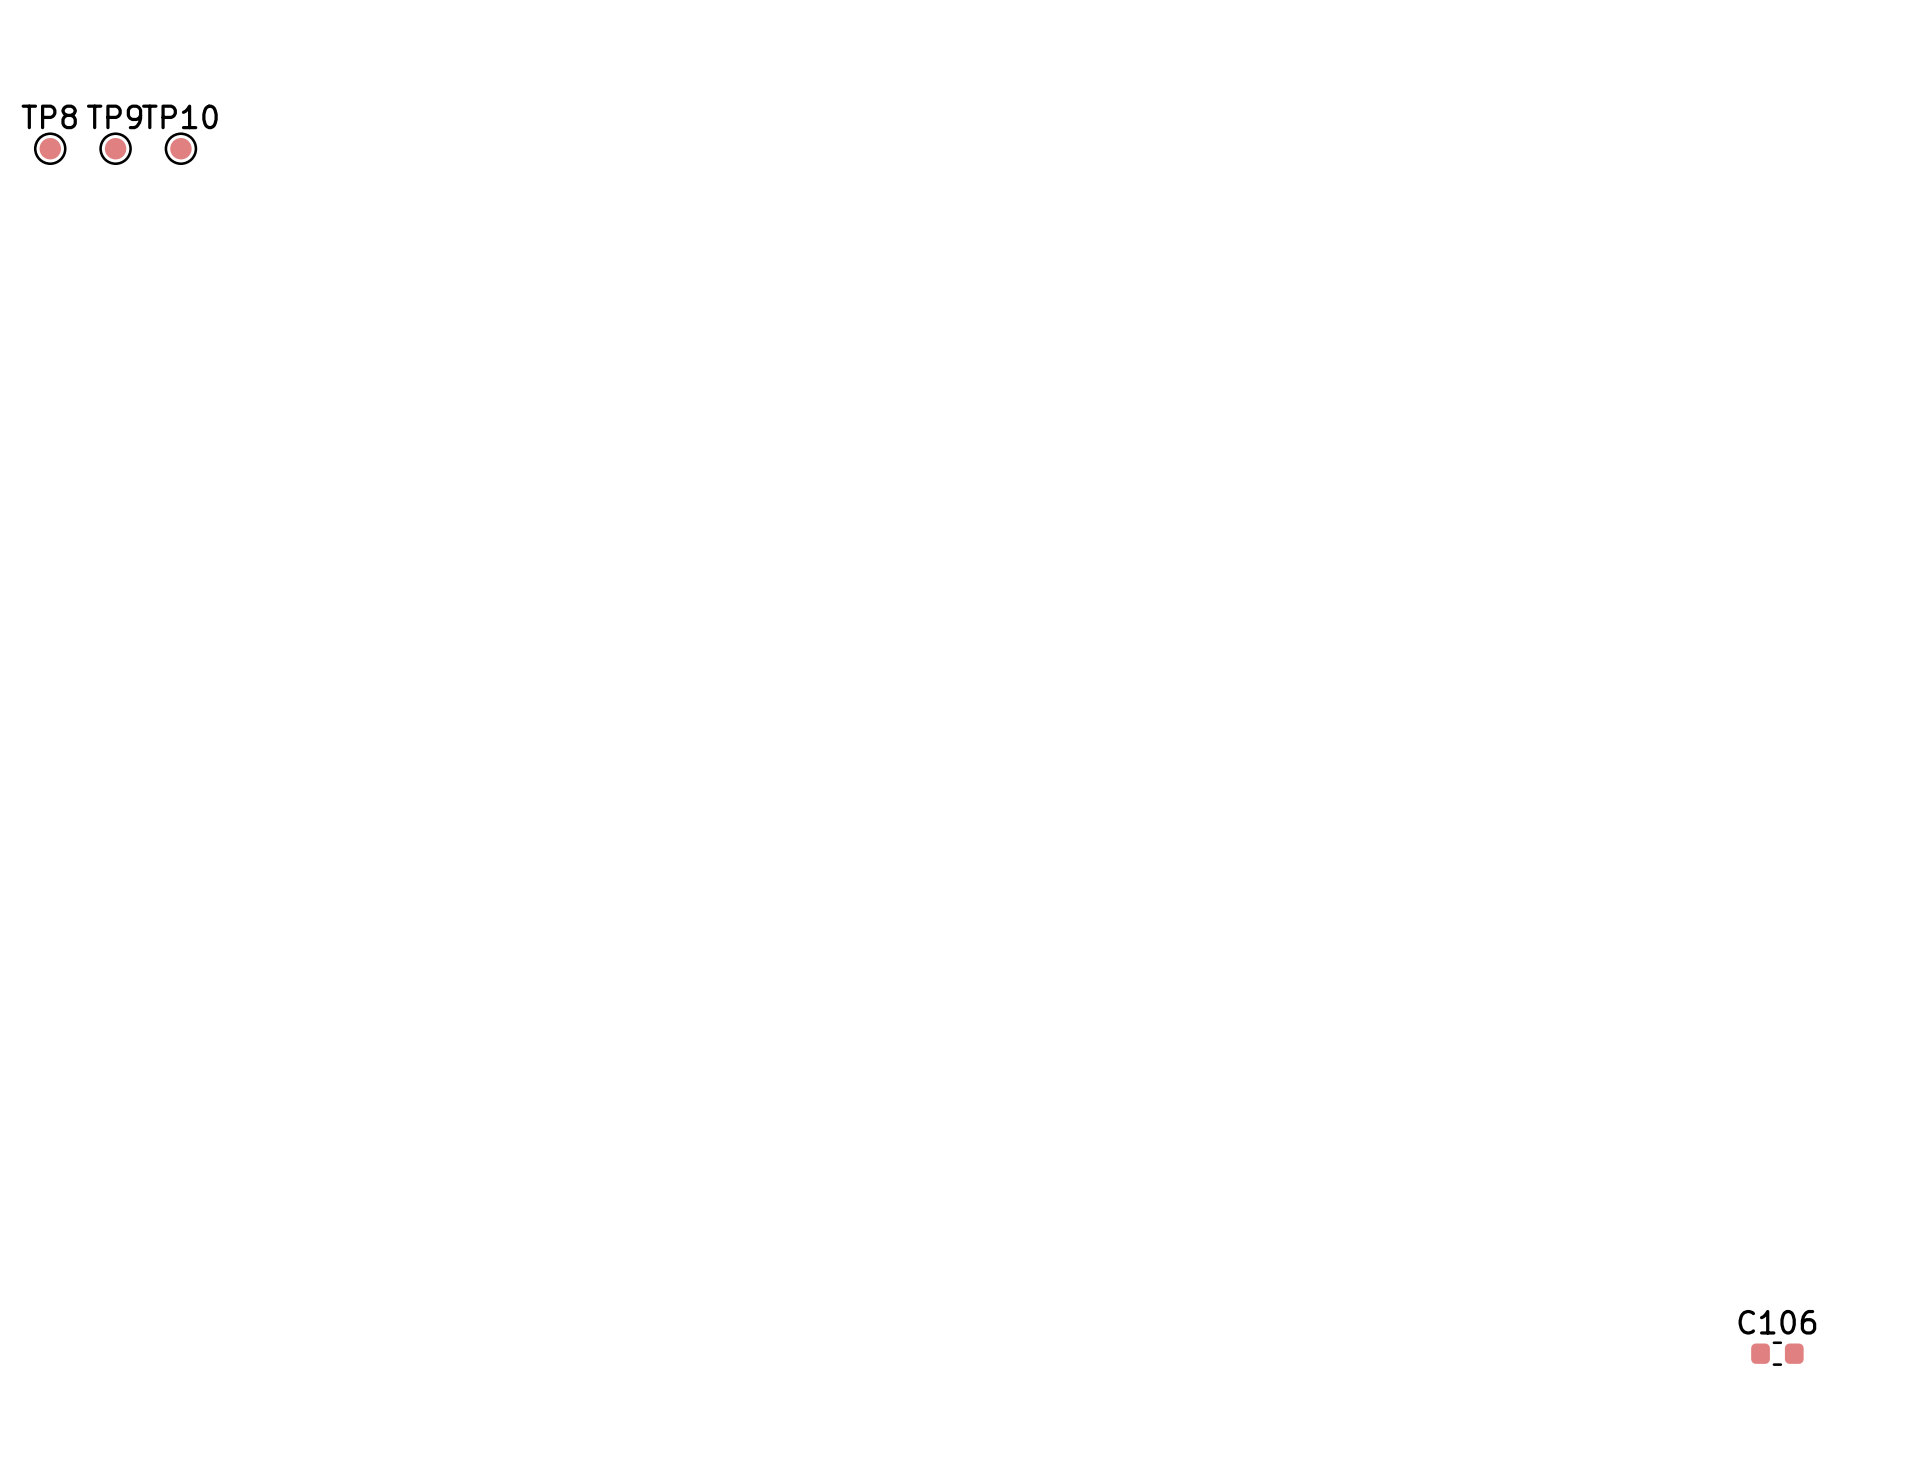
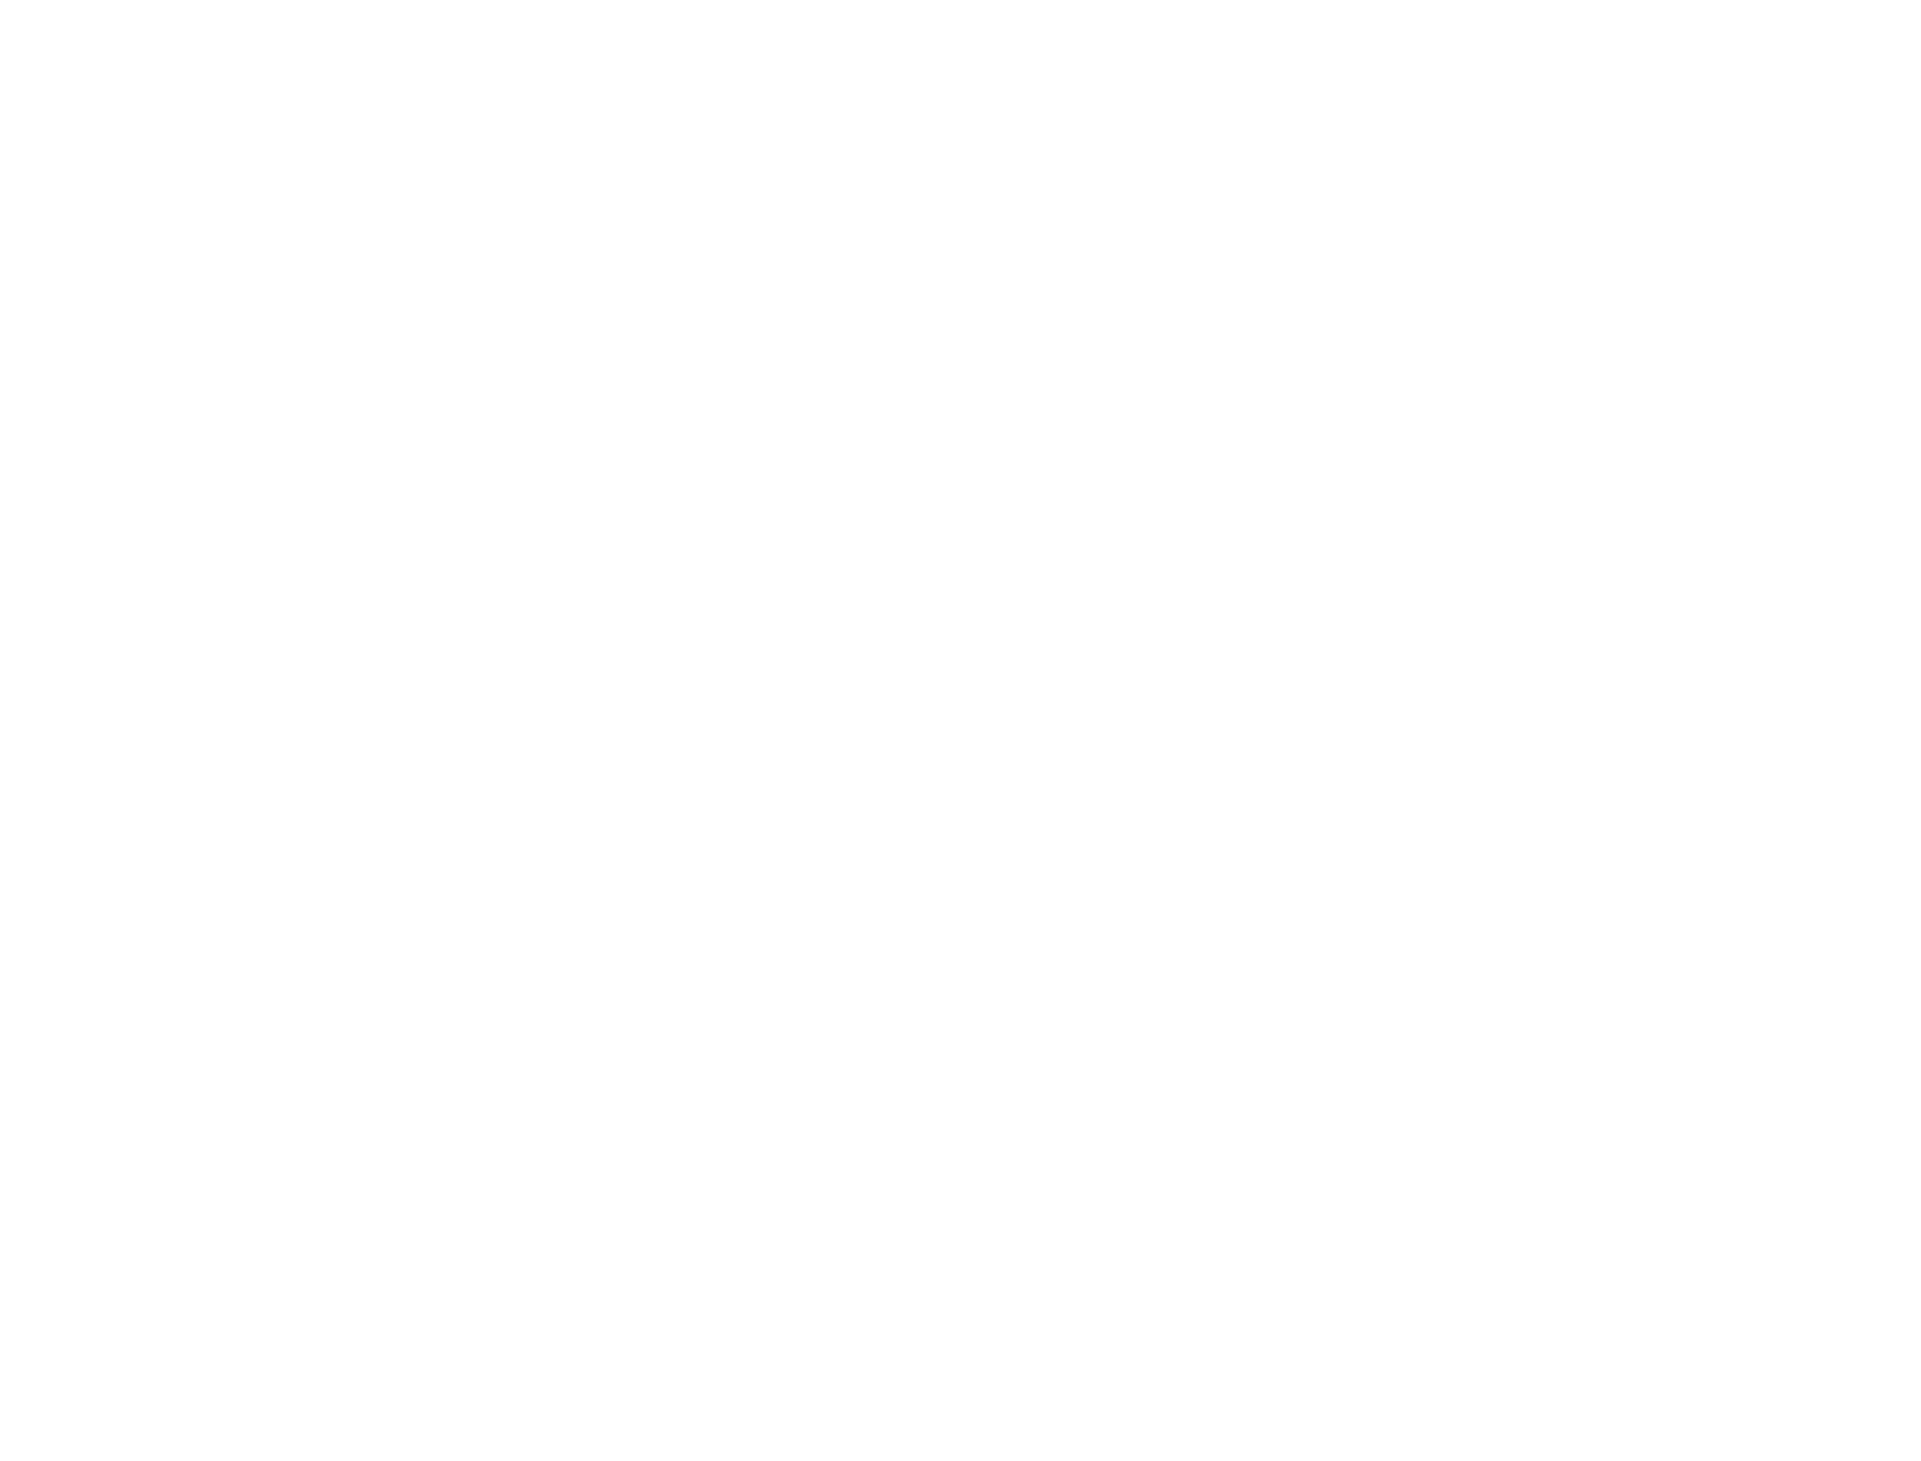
TP8: (50, 148) -> none
TP9: (115, 148) -> none
TP10: (180, 148) -> none
C106: (1777, 1353) -> none

